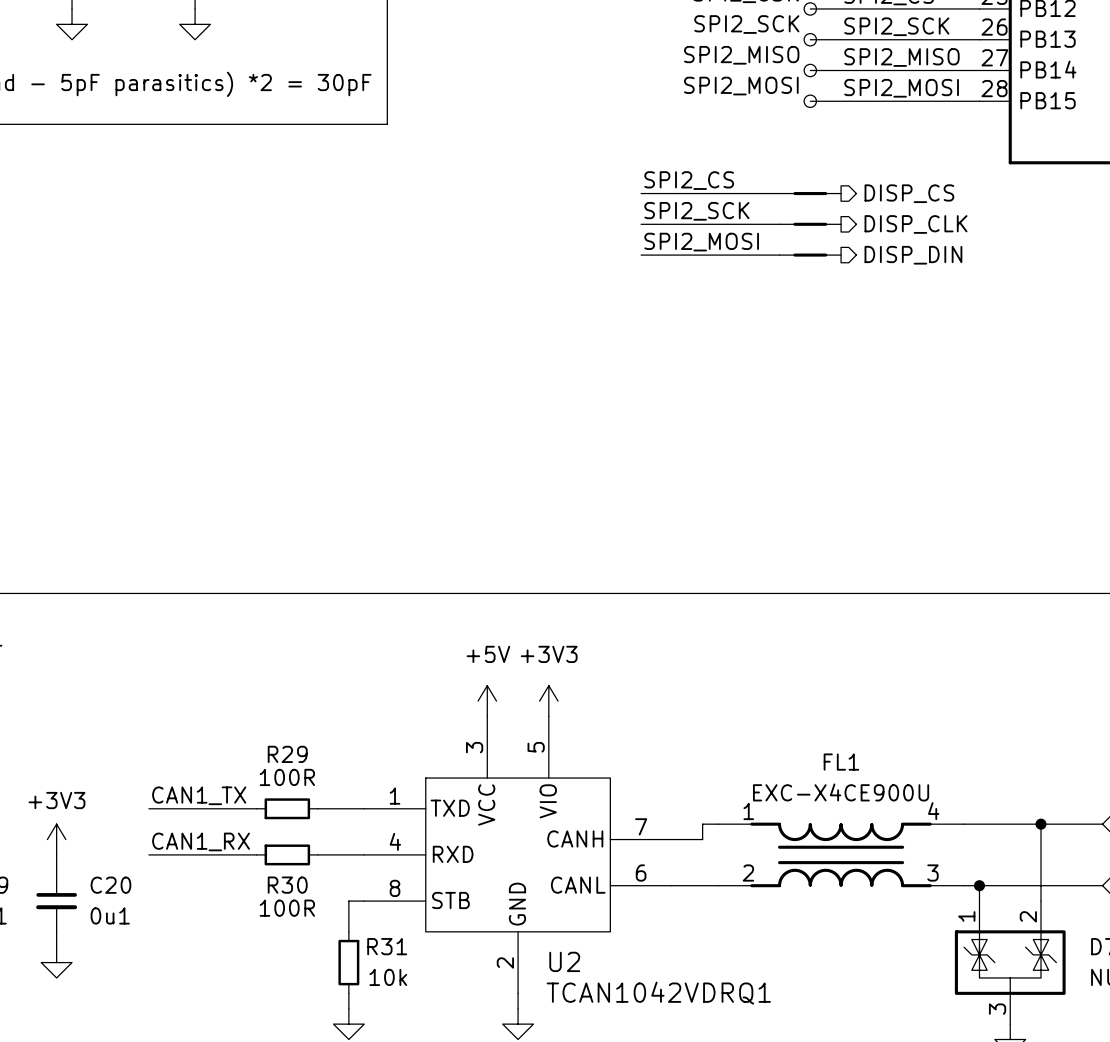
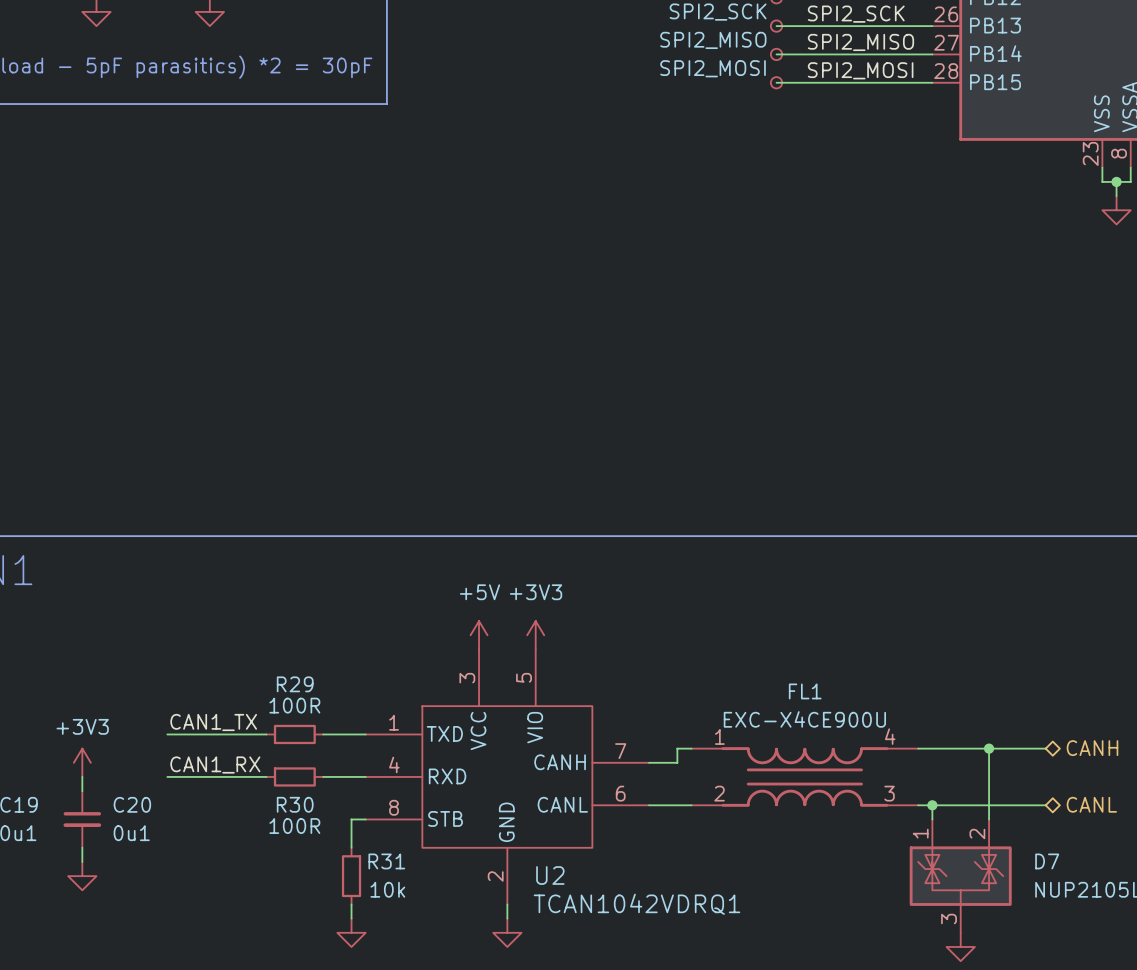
label: SPI2_CS (689, 180) -> none
wire: (641, 193) (779, 193) -> none
part: (810, 193) -> none
hierarchical label: DISP_CS (909, 193) -> none
label: SPI2_SCK (696, 211) -> none
wire: (641, 224) (779, 224) -> none
part: (810, 224) -> none
hierarchical label: DISP_CLK (916, 224) -> none
label: SPI2_MOSI (701, 242) -> none
wire: (641, 255) (779, 255) -> none
part: (810, 255) -> none
hierarchical label: DISP_DIN (913, 255) -> none

